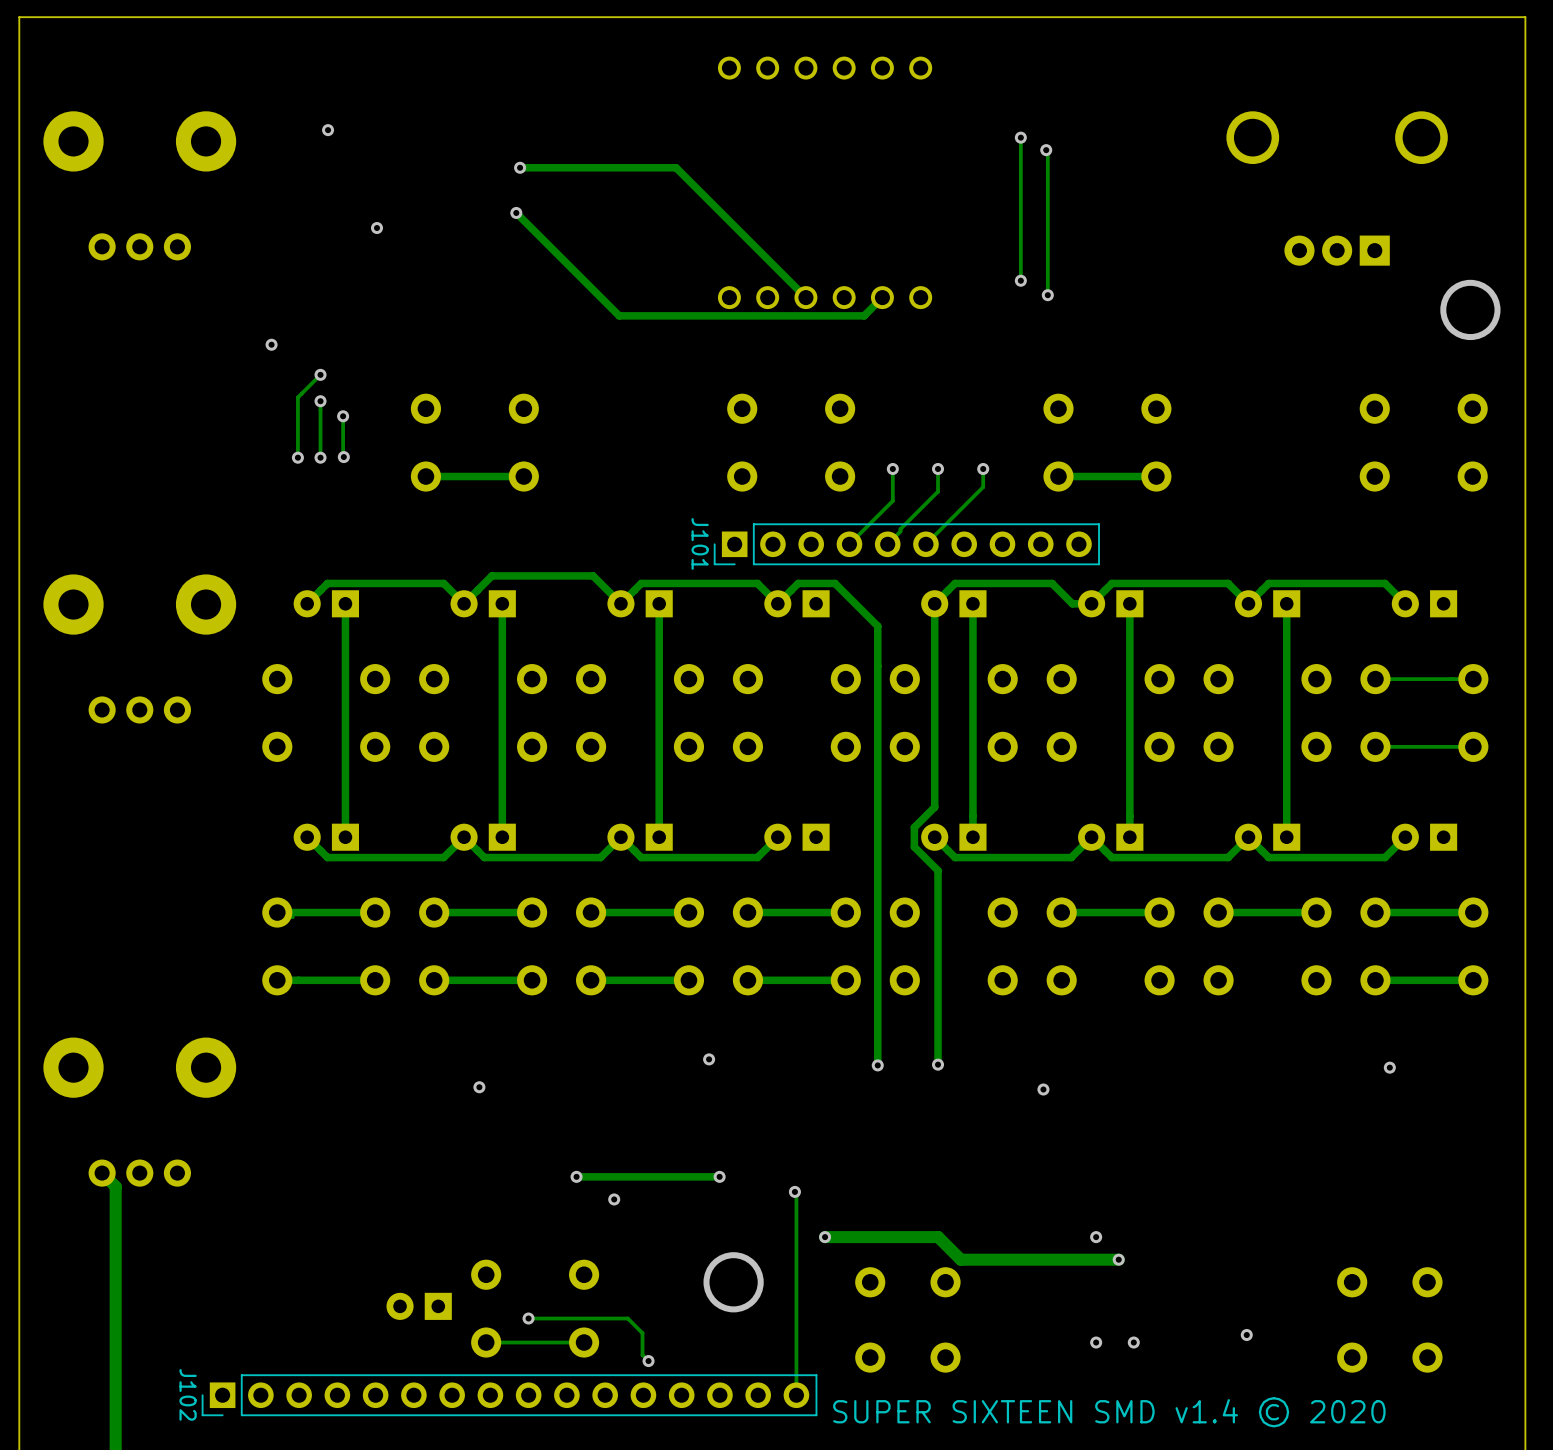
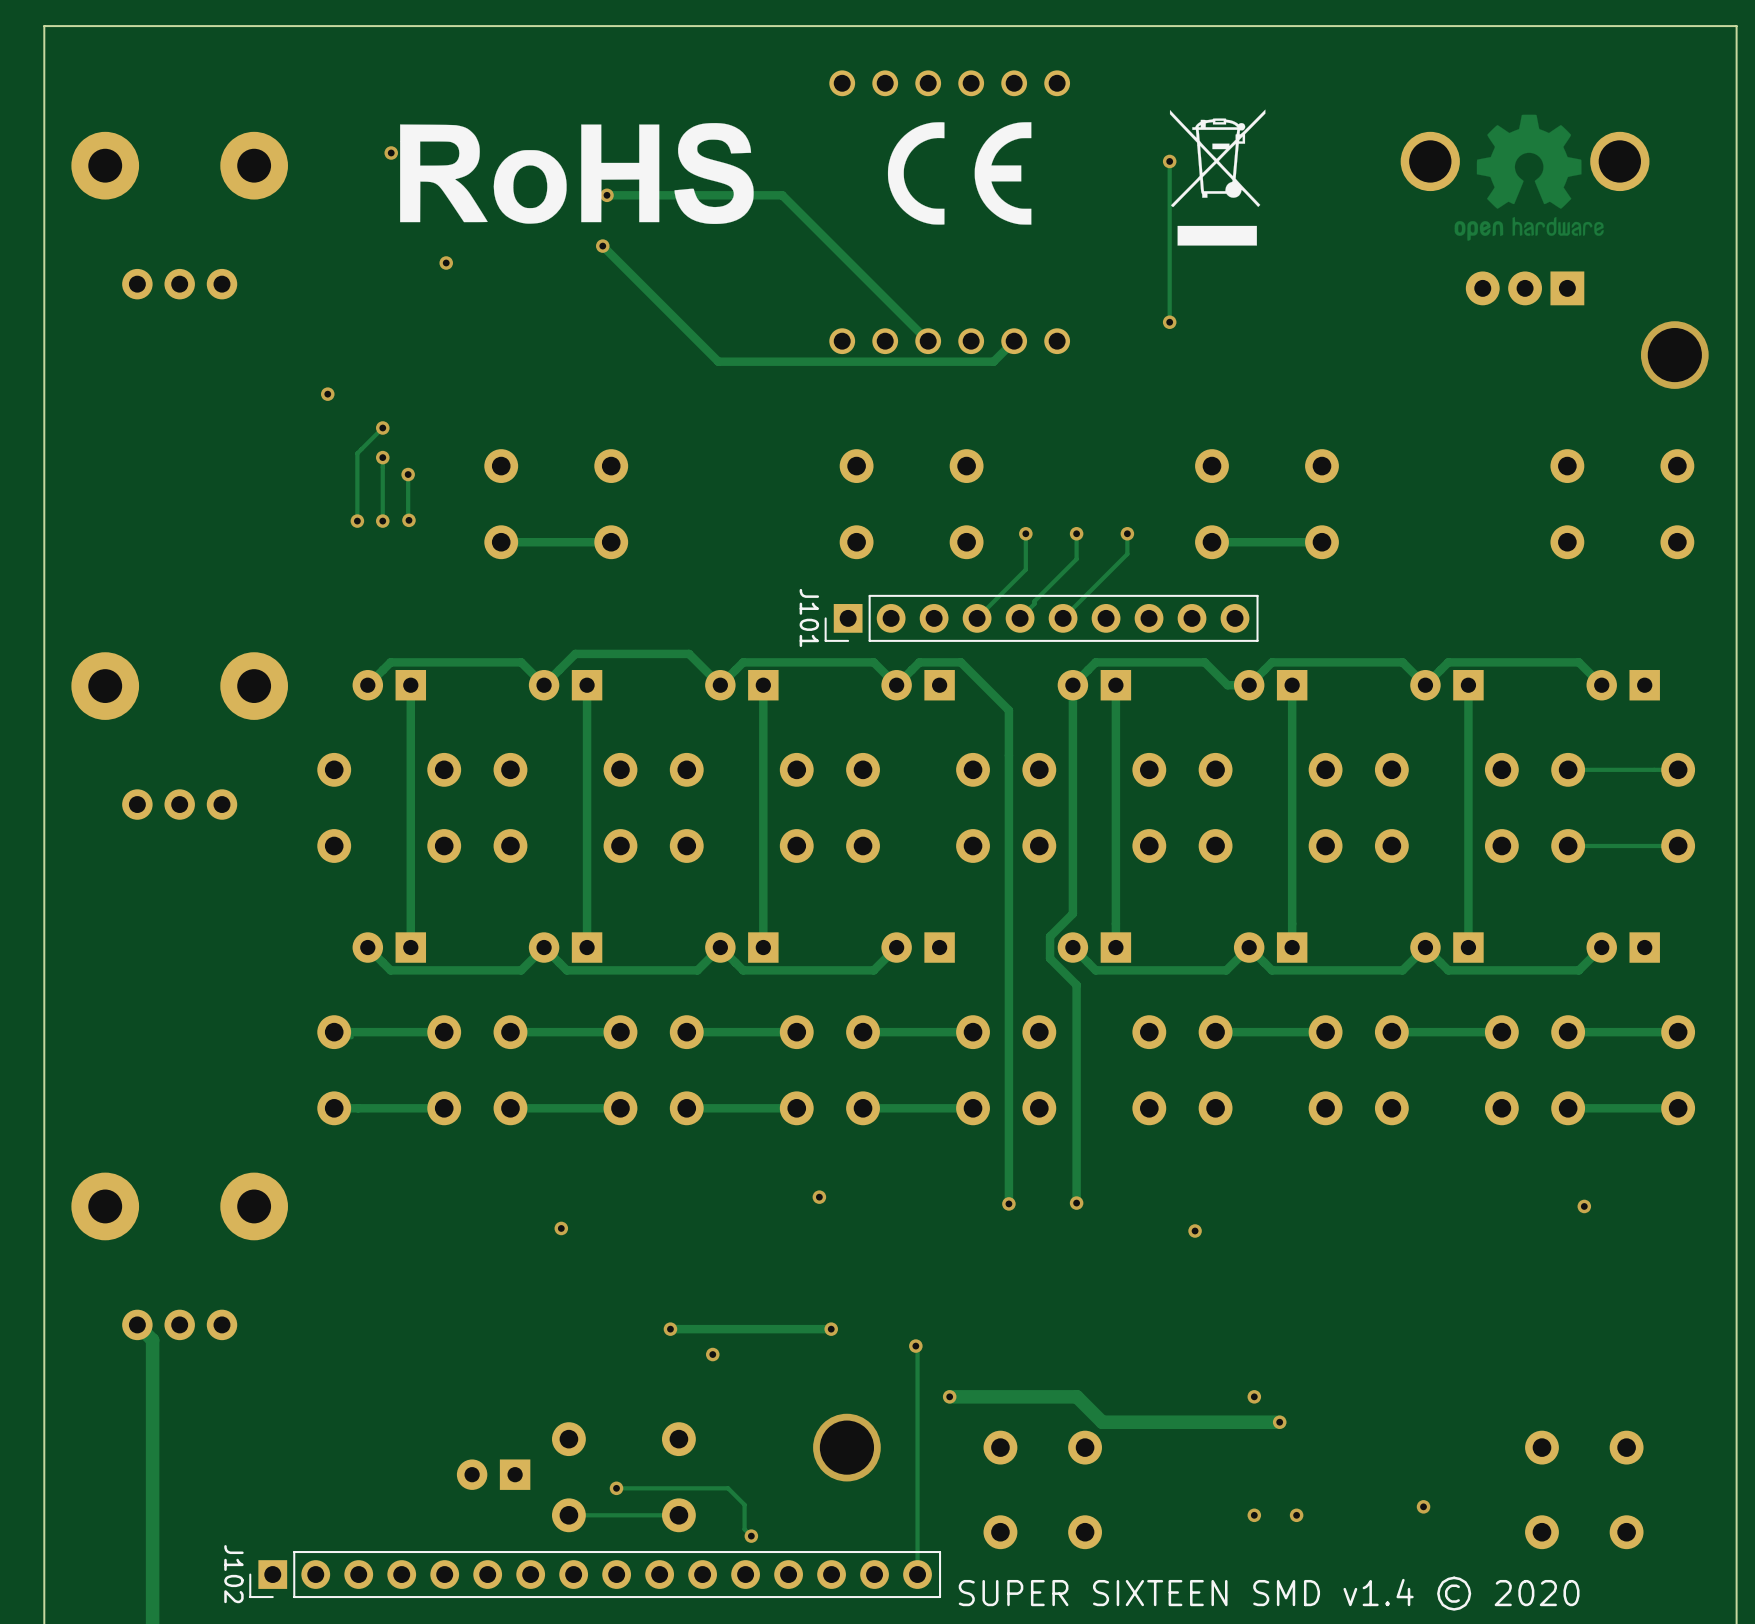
drawing: none -> [1169, 109, 1266, 246]
drawing: none -> [1454, 114, 1604, 241]
drawing: none -> [887, 122, 1032, 225]
drawing: none -> [400, 123, 754, 225]
track: (1046, 150) (1047, 151) (1047, 295) -> none
via: (1046, 150) -> none
via: (1047, 295) -> none

